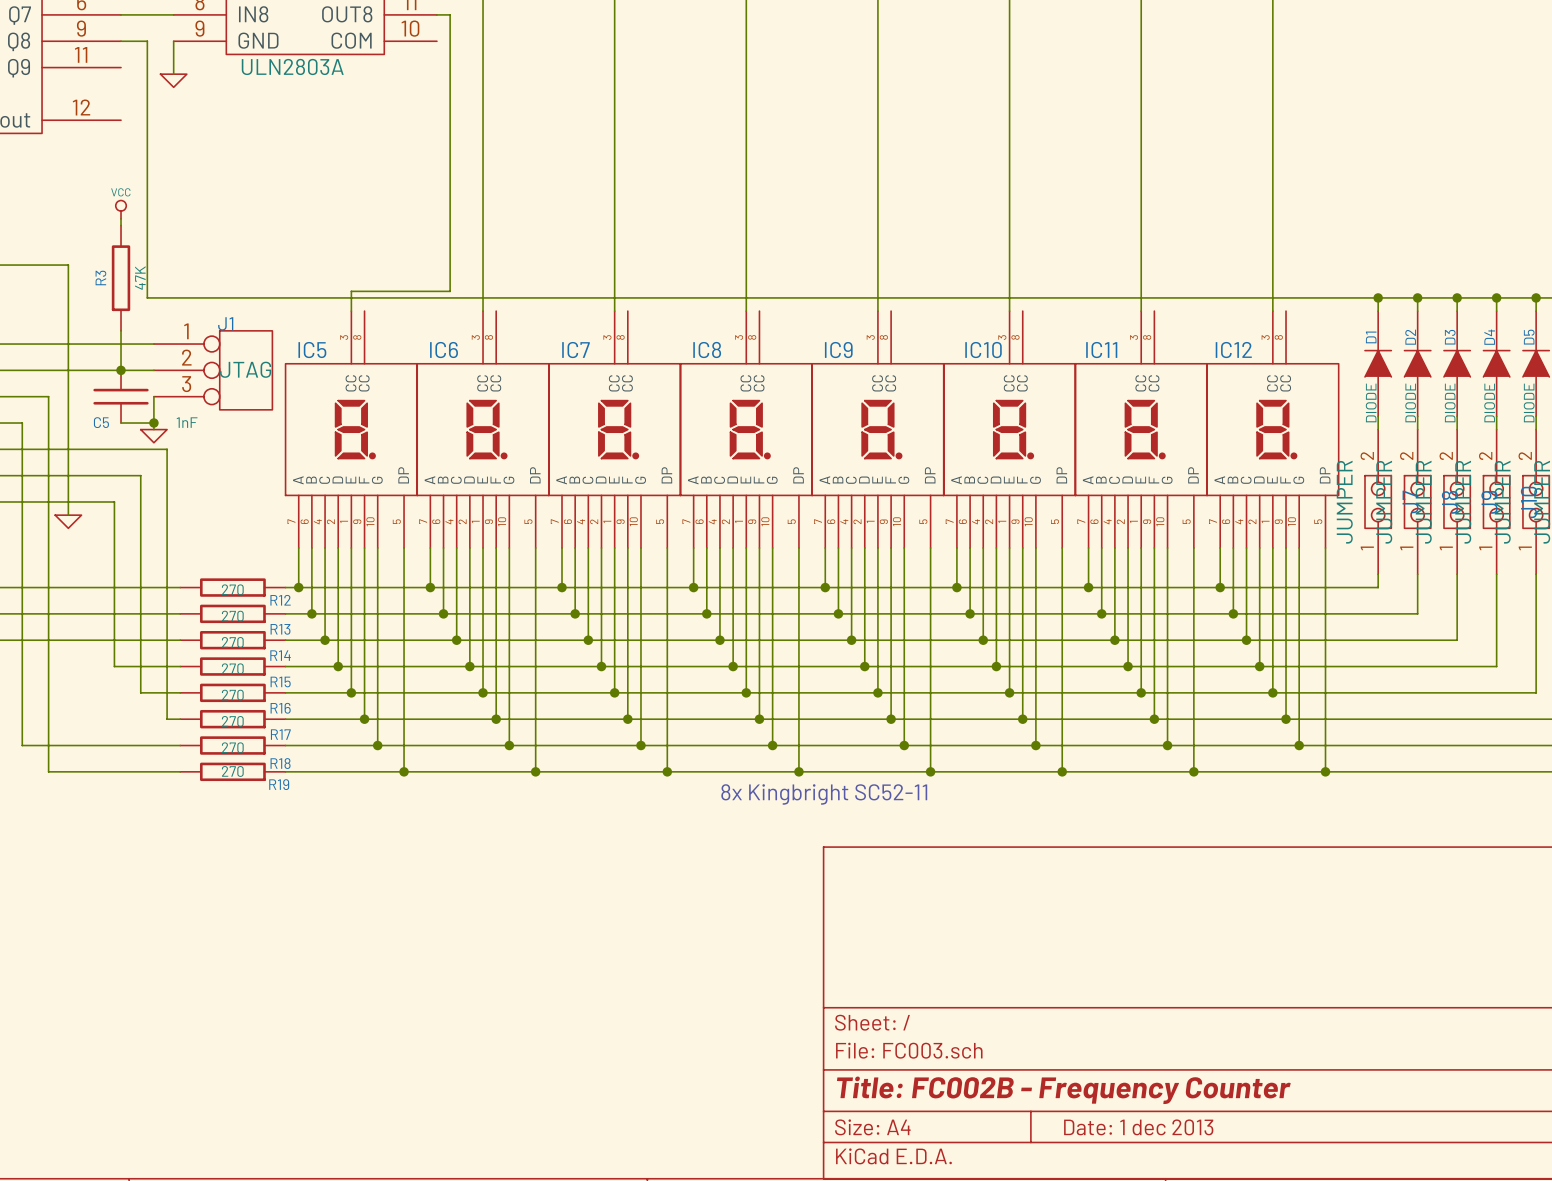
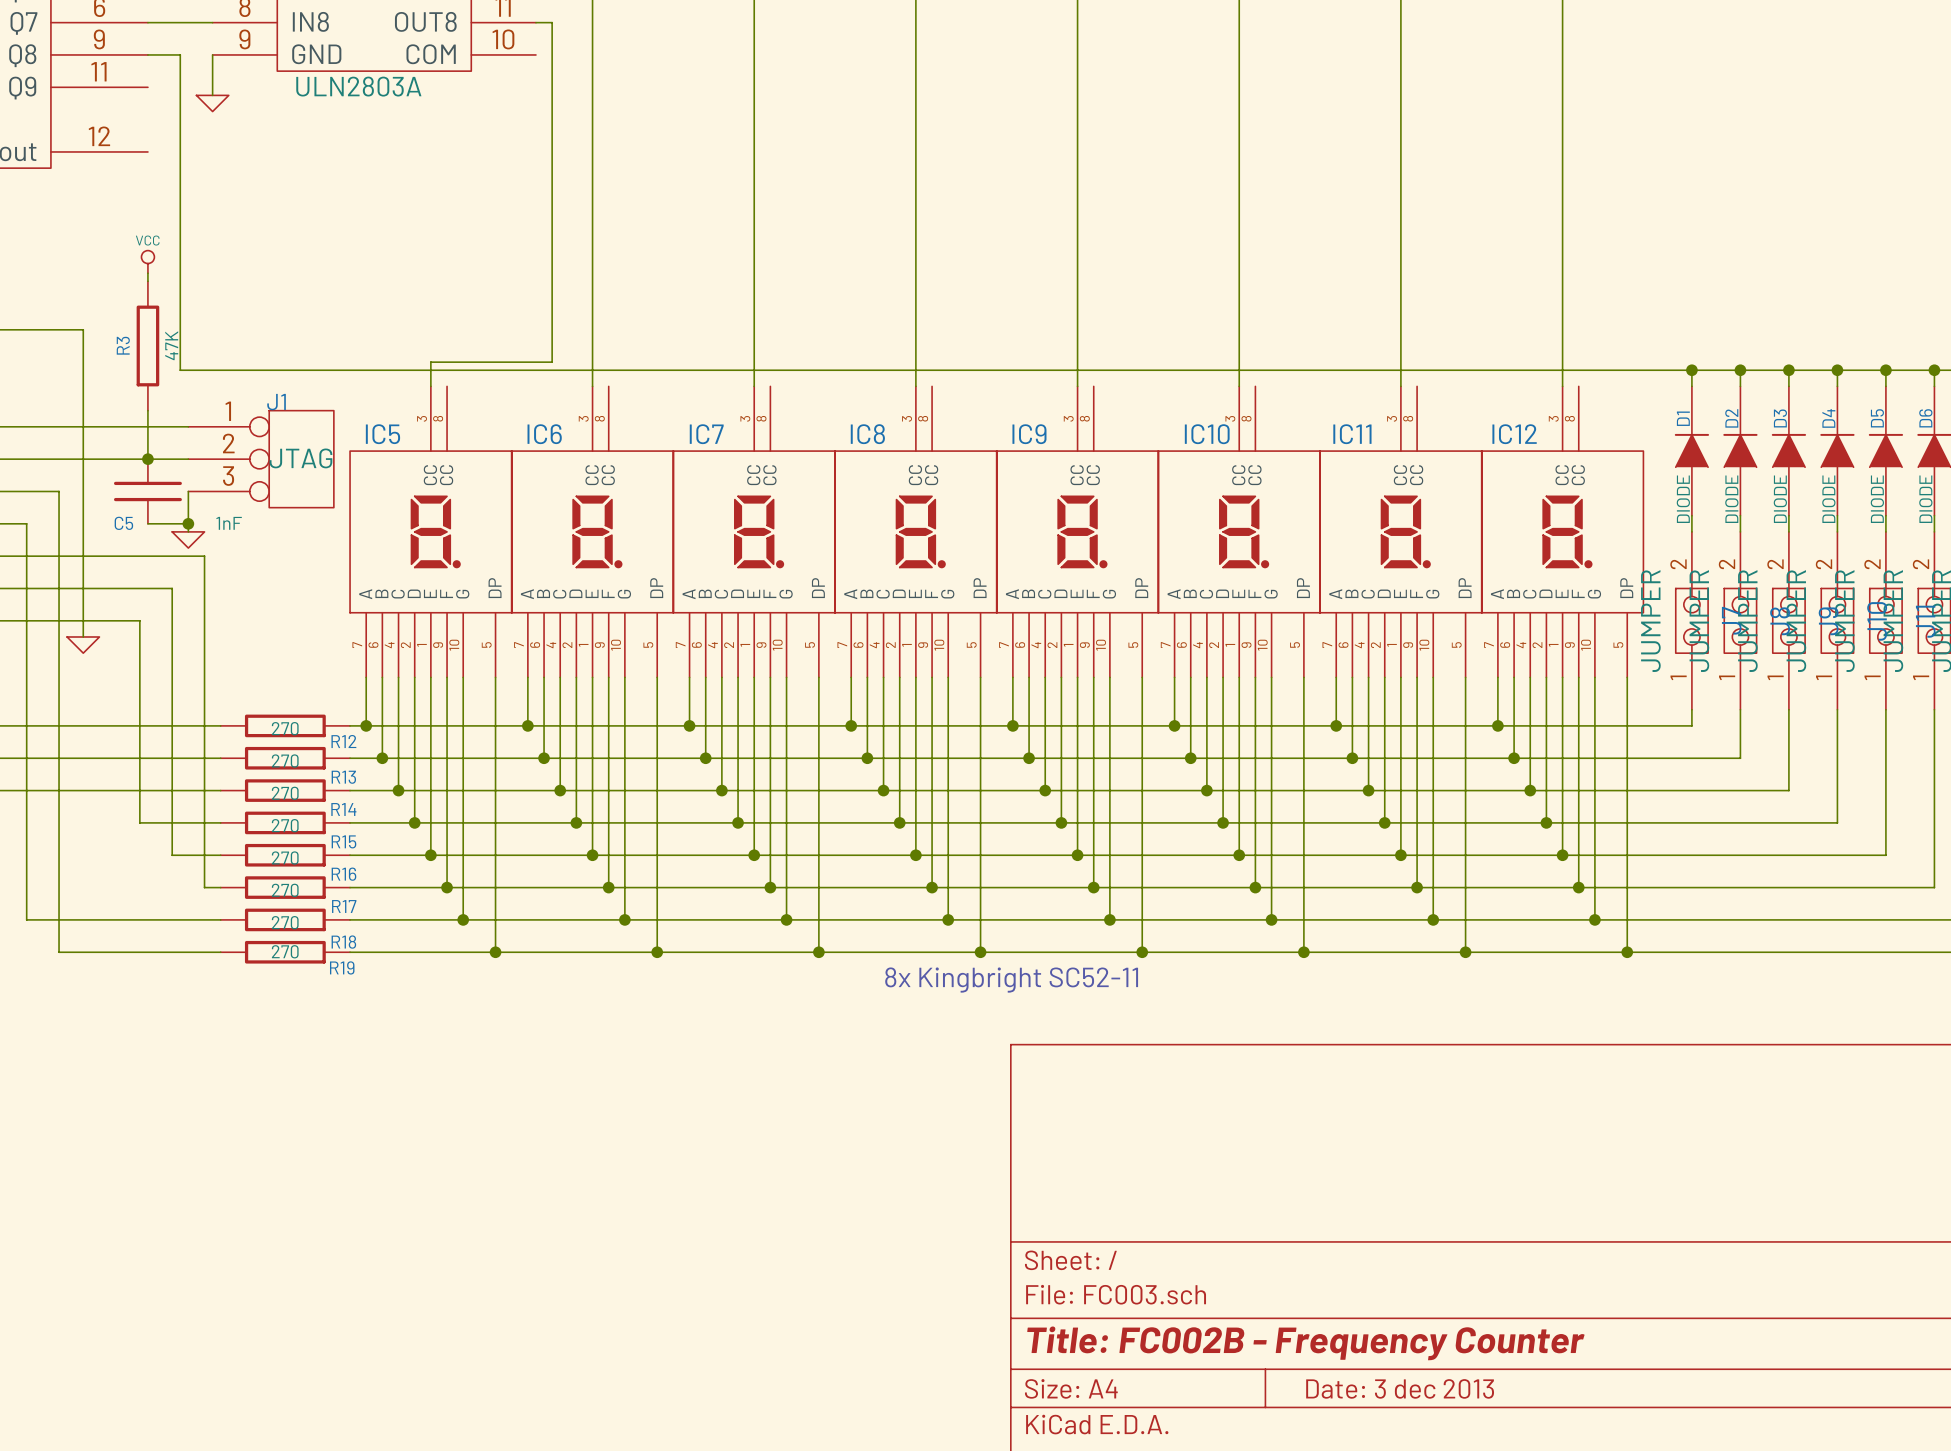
title block: Date: 1 dec 2013 (1138, 1127) -> Date: 3 dec 2013 (1400, 1388)

